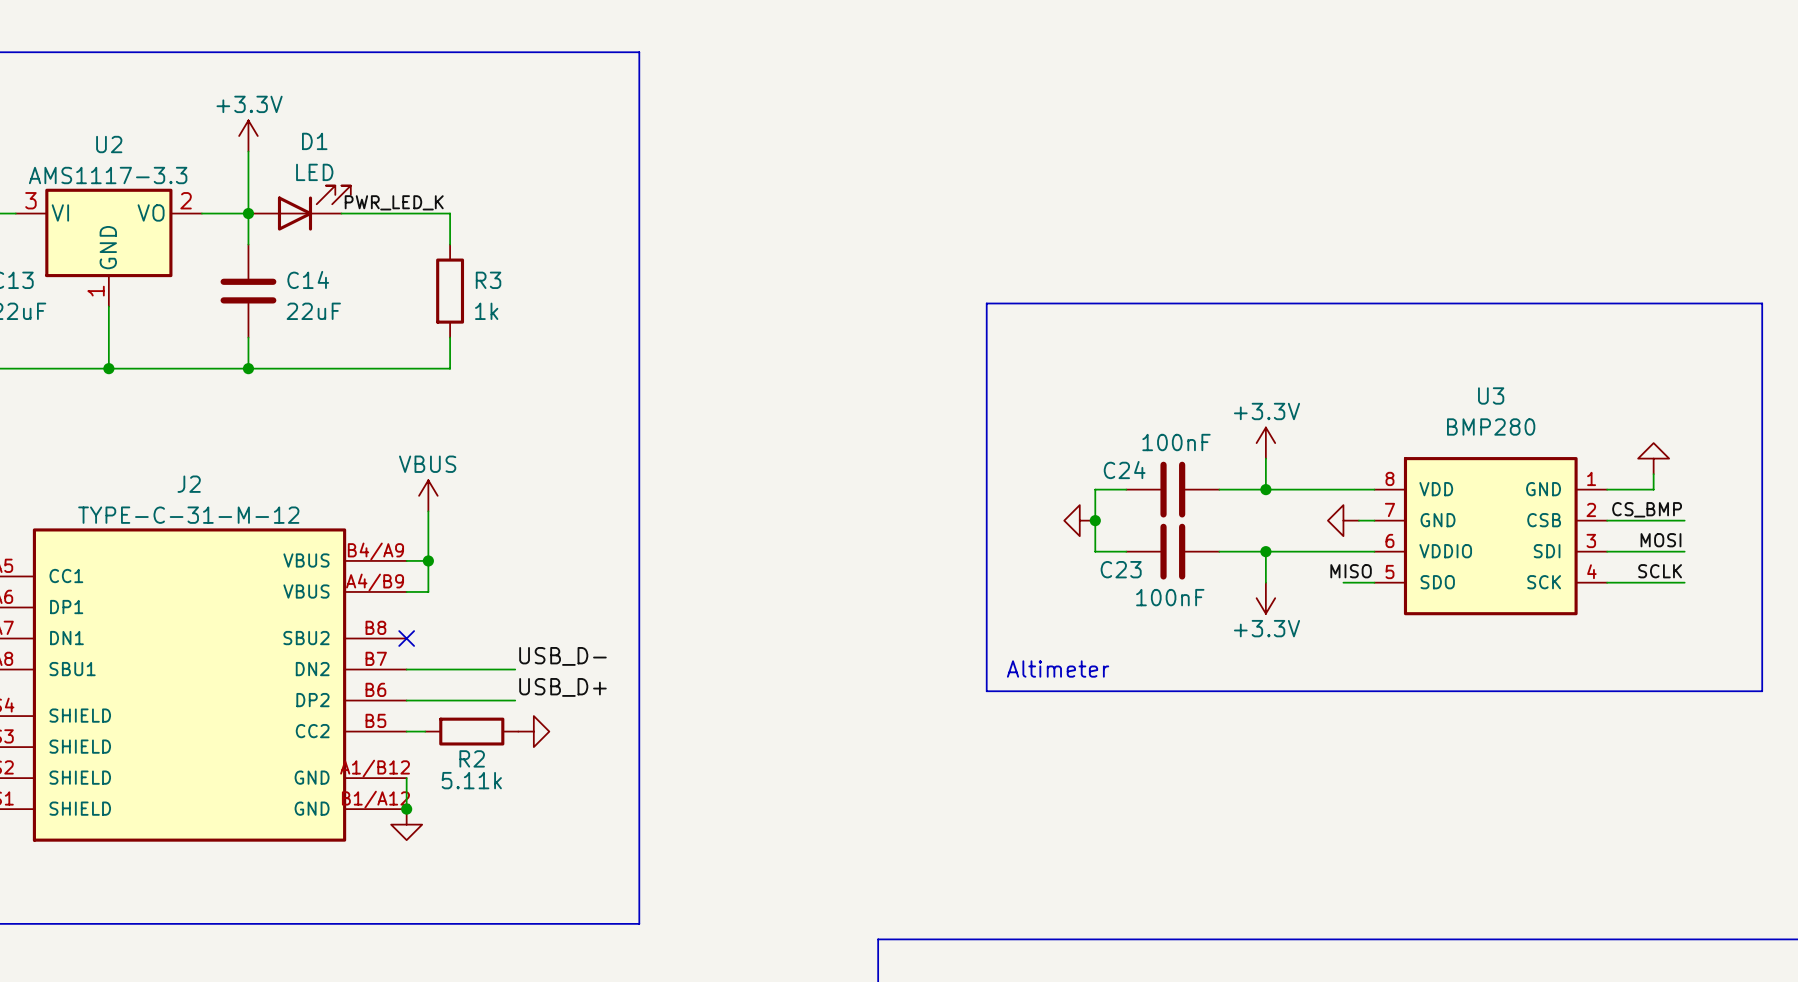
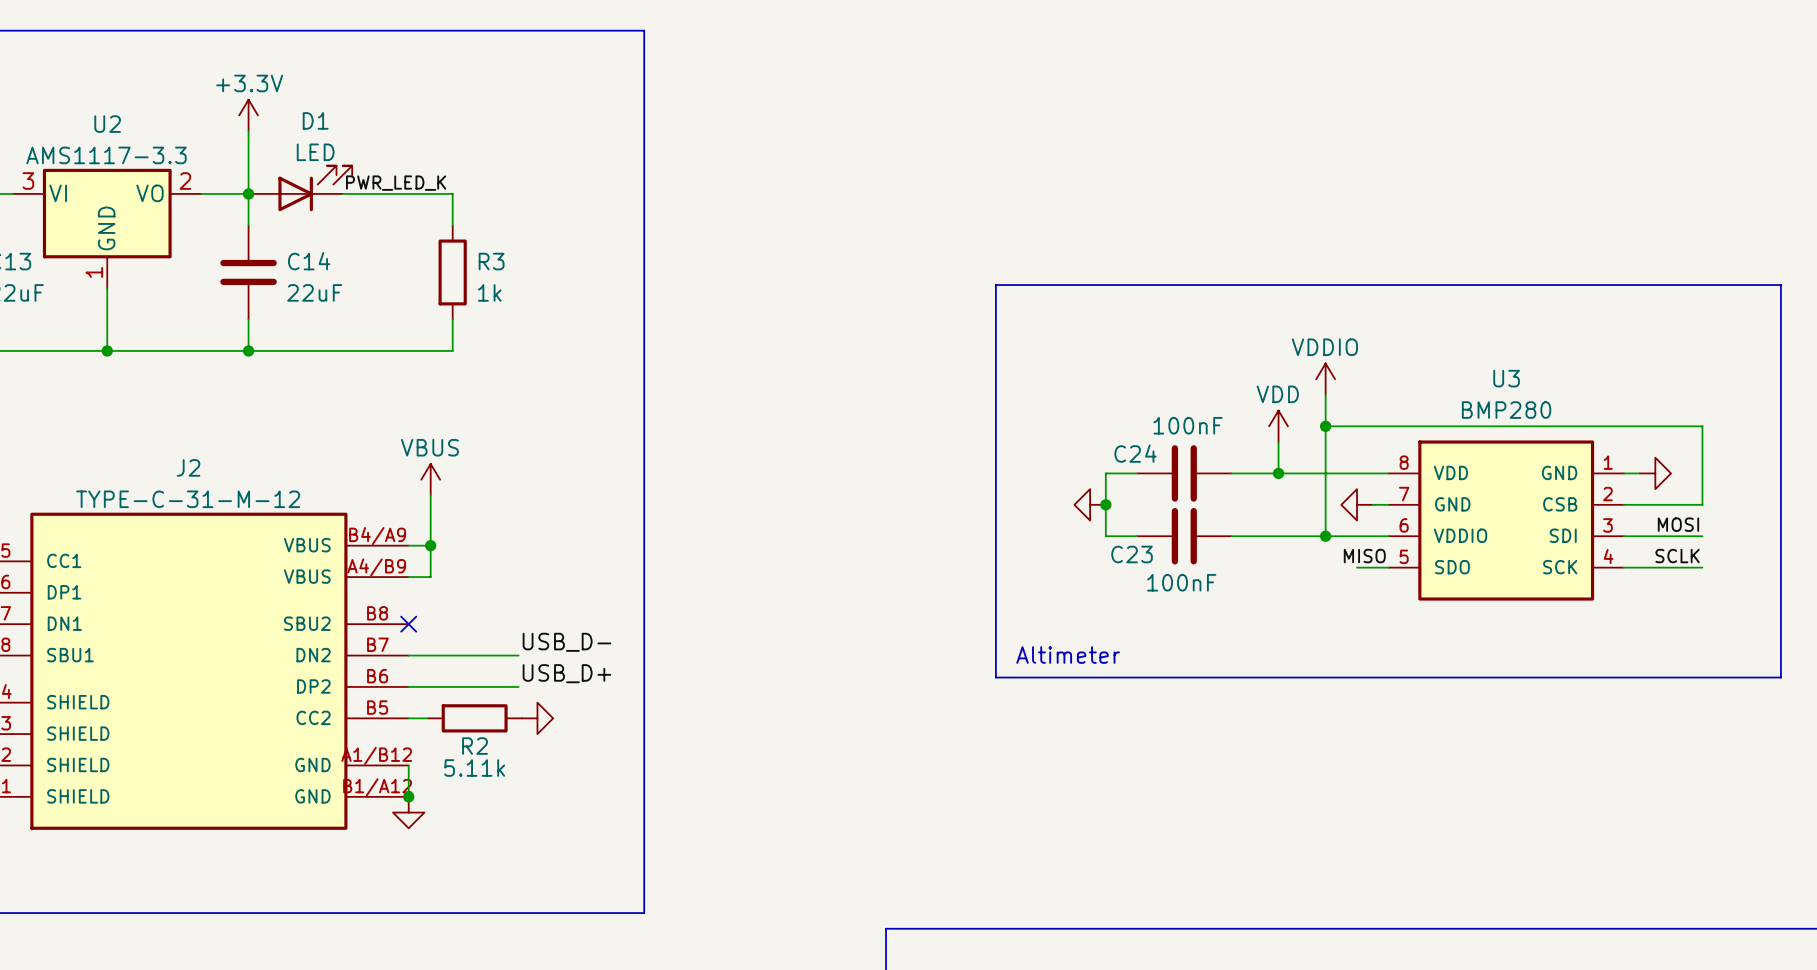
power symbol: none -> VDDIO (1325, 379)
wire: none -> (1325, 394) (1325, 536)
power symbol: +3.3V (1265, 443) -> VDD (1278, 426)
wire: none -> (1325, 426) (1702, 426) (1702, 504)
junction: none -> (1325, 426)
power symbol rotation: 0° (1653, 458) -> 90° clockwise (1655, 473)
power symbol position: (1653, 458) -> (1655, 473)
wire: (1653, 474) (1653, 489) (1622, 489) -> none
label: CS_BMP (1647, 509) -> none
wire: (1265, 551) (1265, 582) -> none
junction position: (1265, 551) -> (1325, 536)
power symbol: +3.3V (1265, 598) -> none

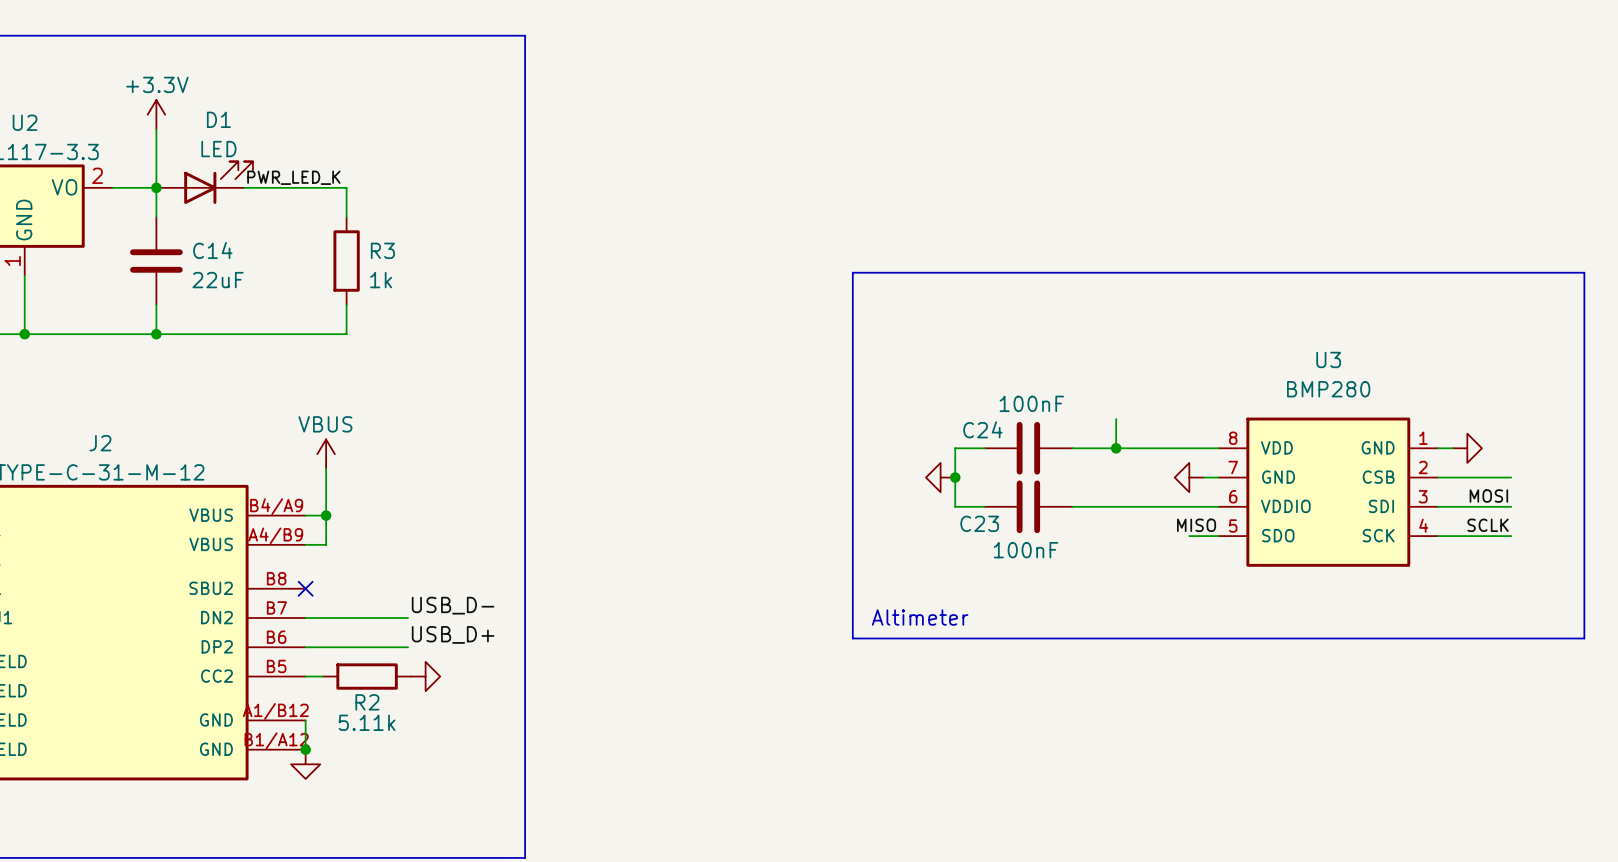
power symbol: VDDIO (1325, 379) -> none
wire: (1325, 394) (1325, 536) -> none
power symbol: VDD (1278, 426) -> none
wire: (1325, 426) (1702, 426) (1702, 504) -> none
junction: (1325, 426) -> none
junction: (1325, 536) -> none

